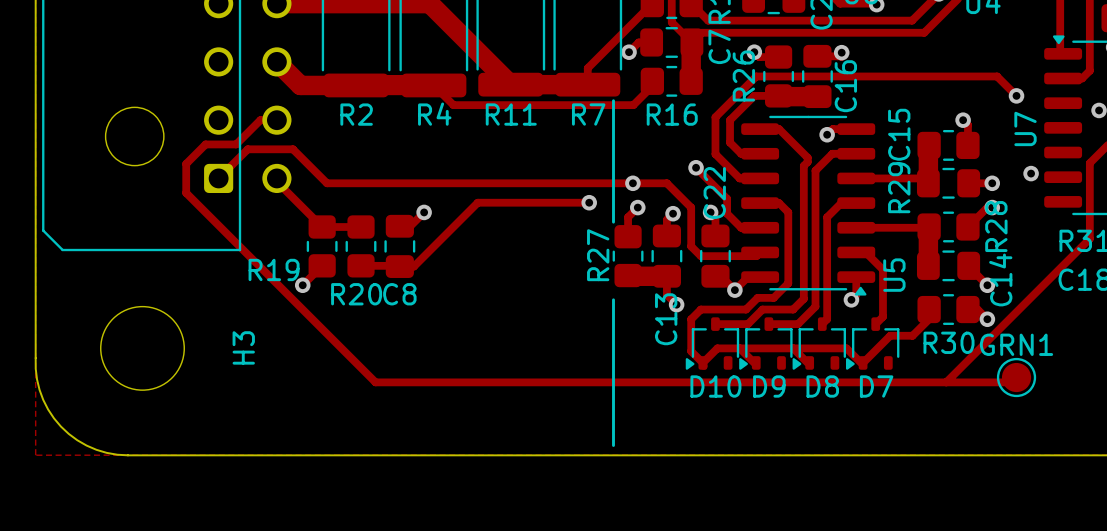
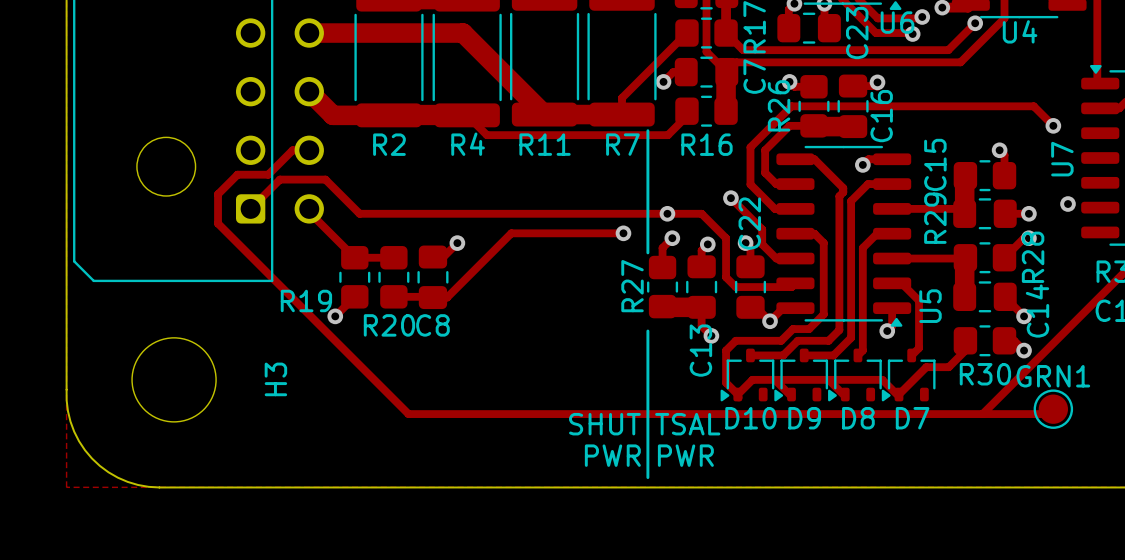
text: none -> SHUT (604, 424)
text: none -> TSAL (687, 424)
text: none -> PWR (612, 455)
text: none -> PWR (685, 455)

